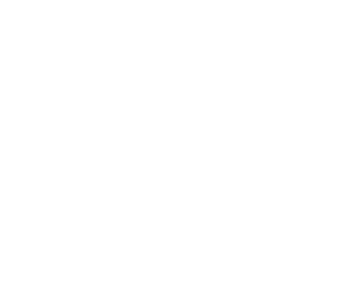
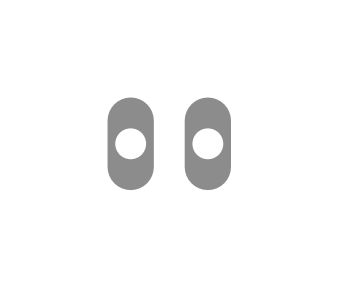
part: none -> (169, 143)

